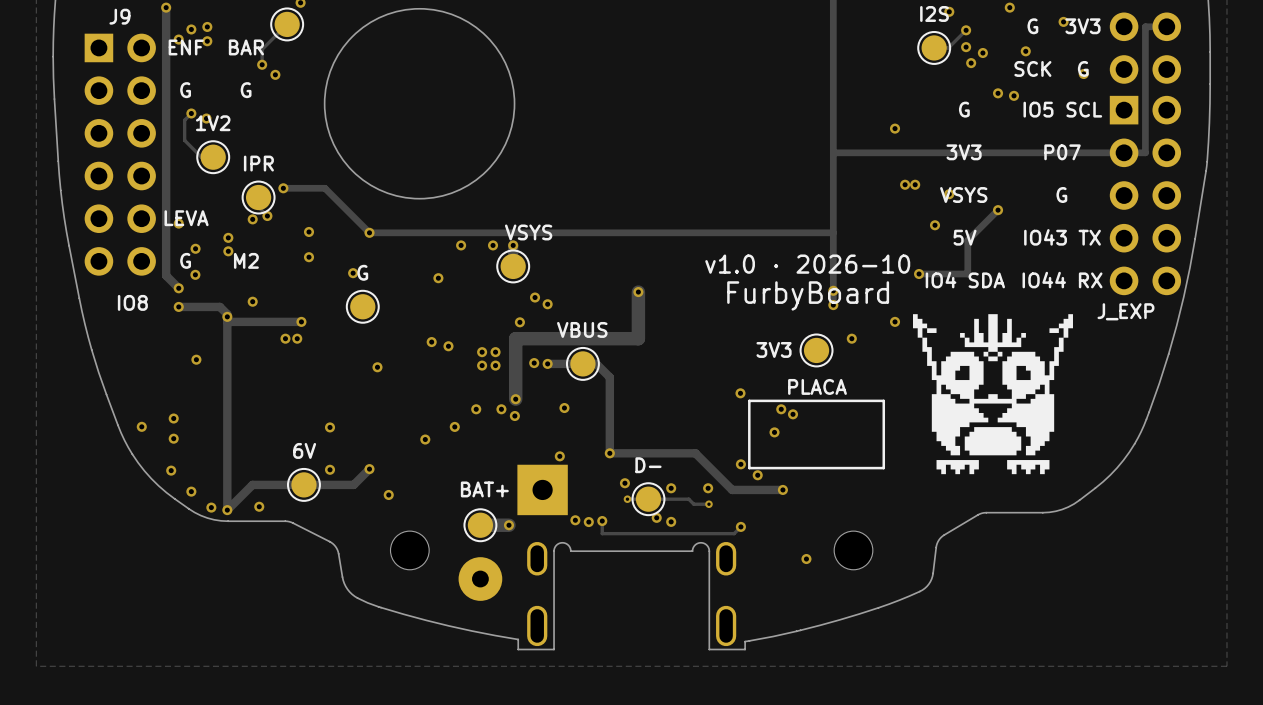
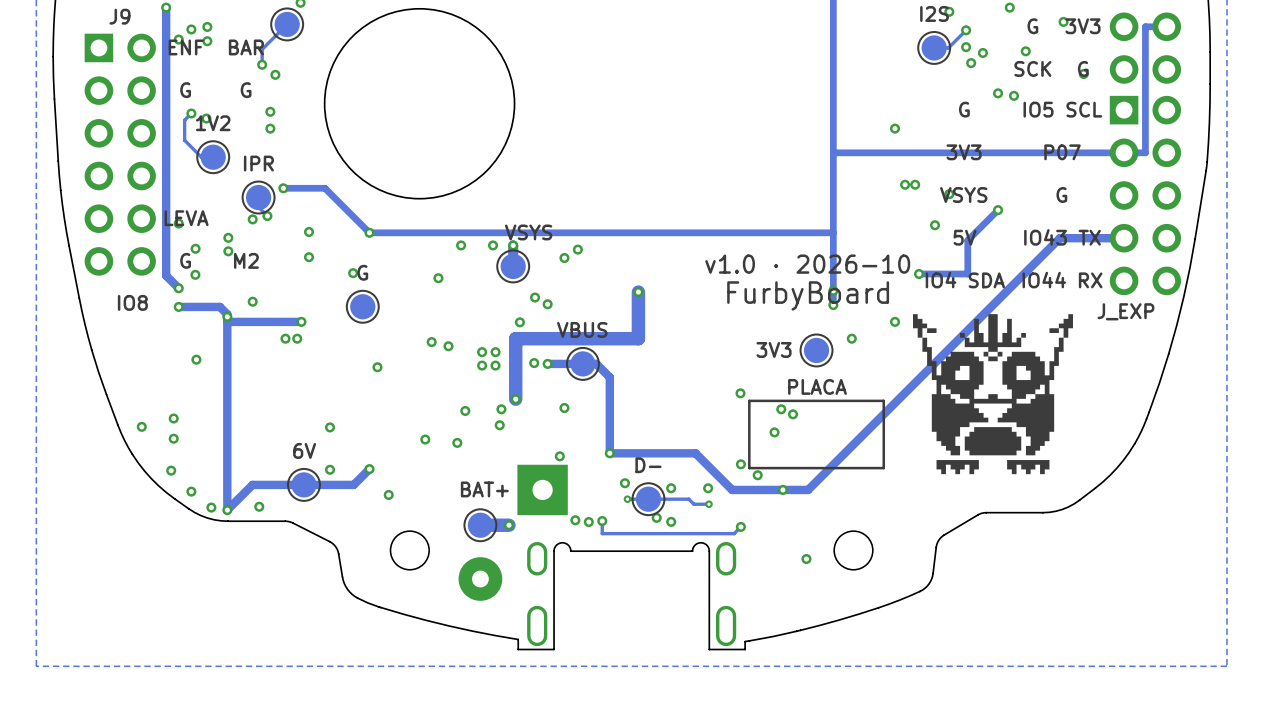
via: none -> (270, 111)
via: none -> (270, 128)
track: none -> (1124, 238) (1059, 238) (808, 489) (782, 489)
via: none -> (577, 249)
via: none -> (564, 258)
via: (476, 409) -> none
via: none -> (465, 410)
via: (514, 416) -> none
via: none -> (499, 425)
via: (454, 426) -> none
via: none -> (457, 442)

